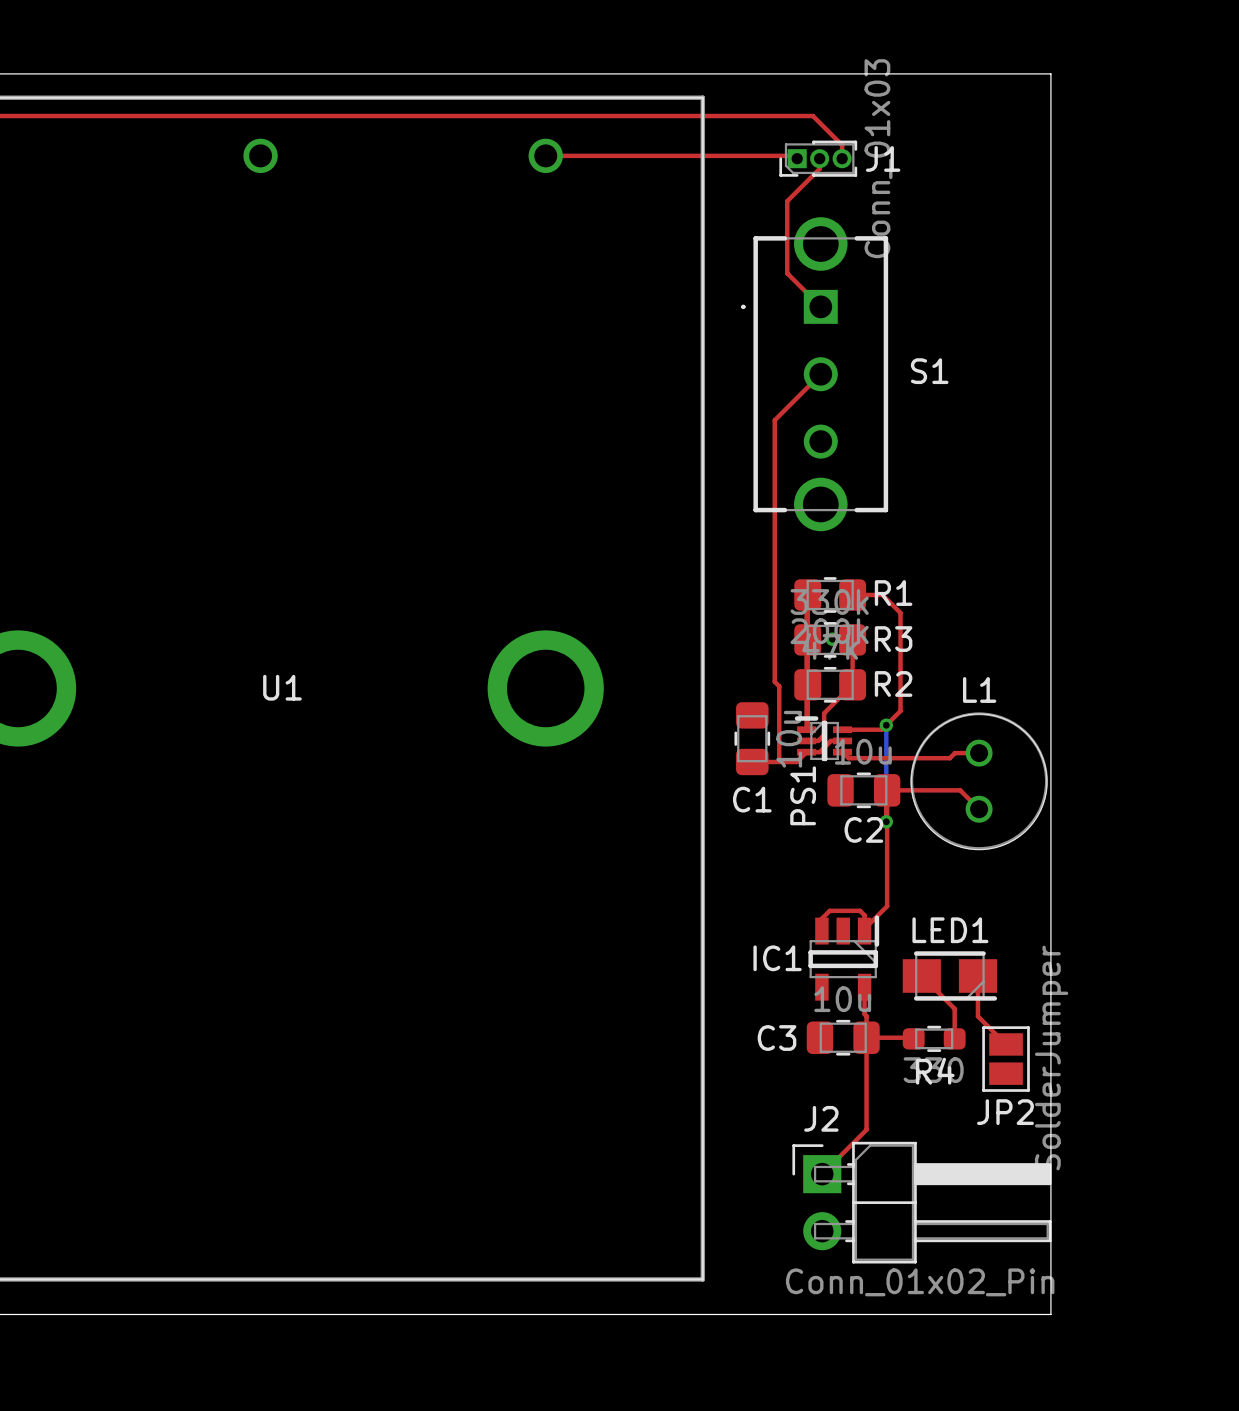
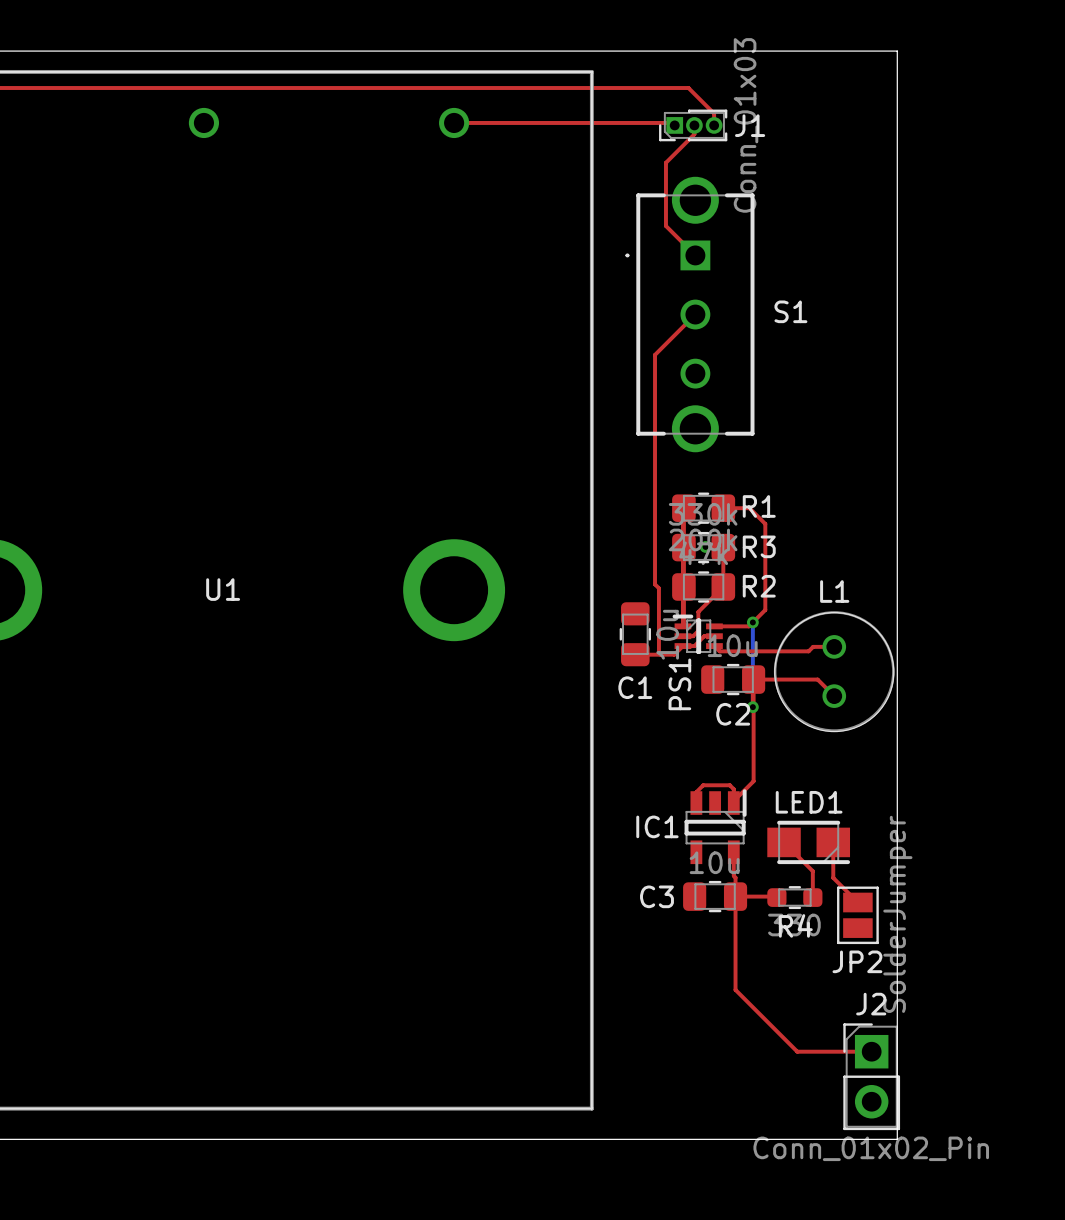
J2 name position: J2 (821, 1118) -> J2 (871, 1004)
top track: (866, 1129) (822, 1174) -> (735, 977) (735, 989) (797, 1051) (871, 1051)
J2 footprint: [792, 1141, 1052, 1264] -> [843, 1023, 901, 1131]

